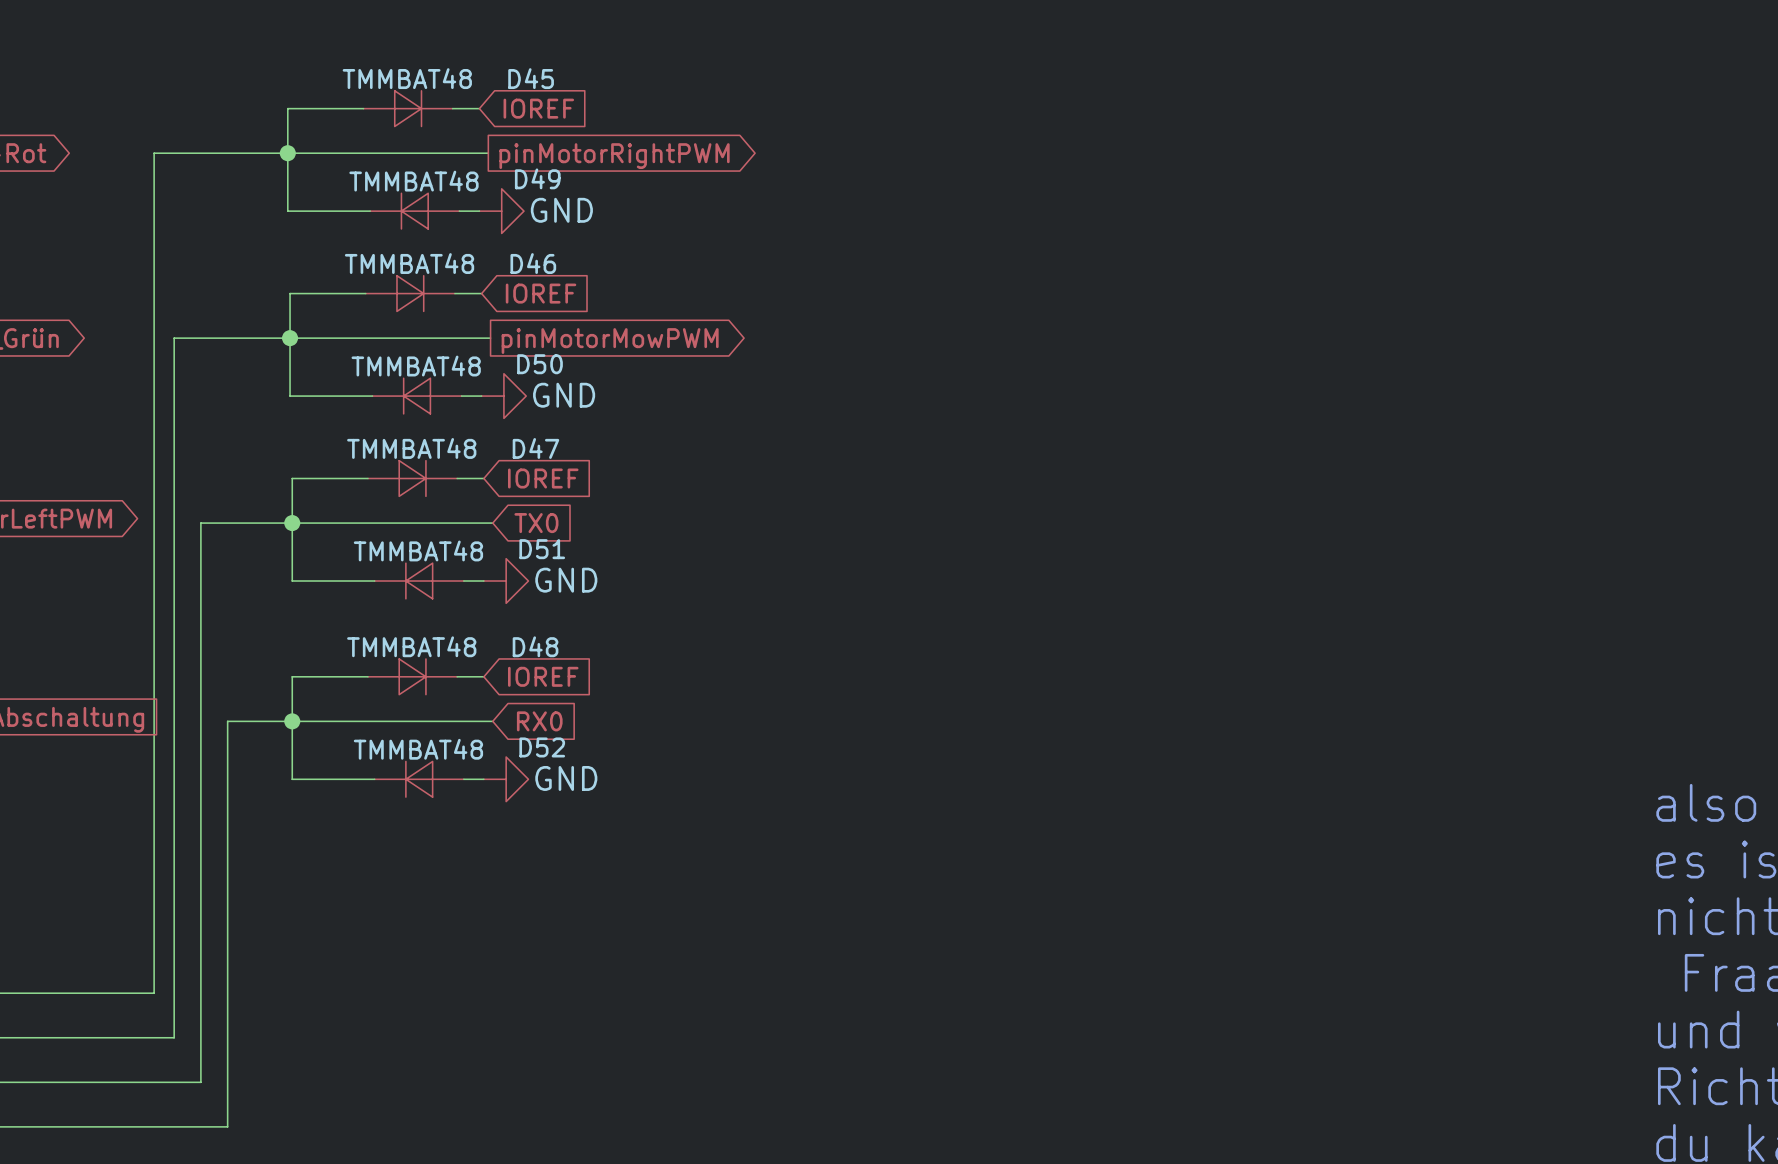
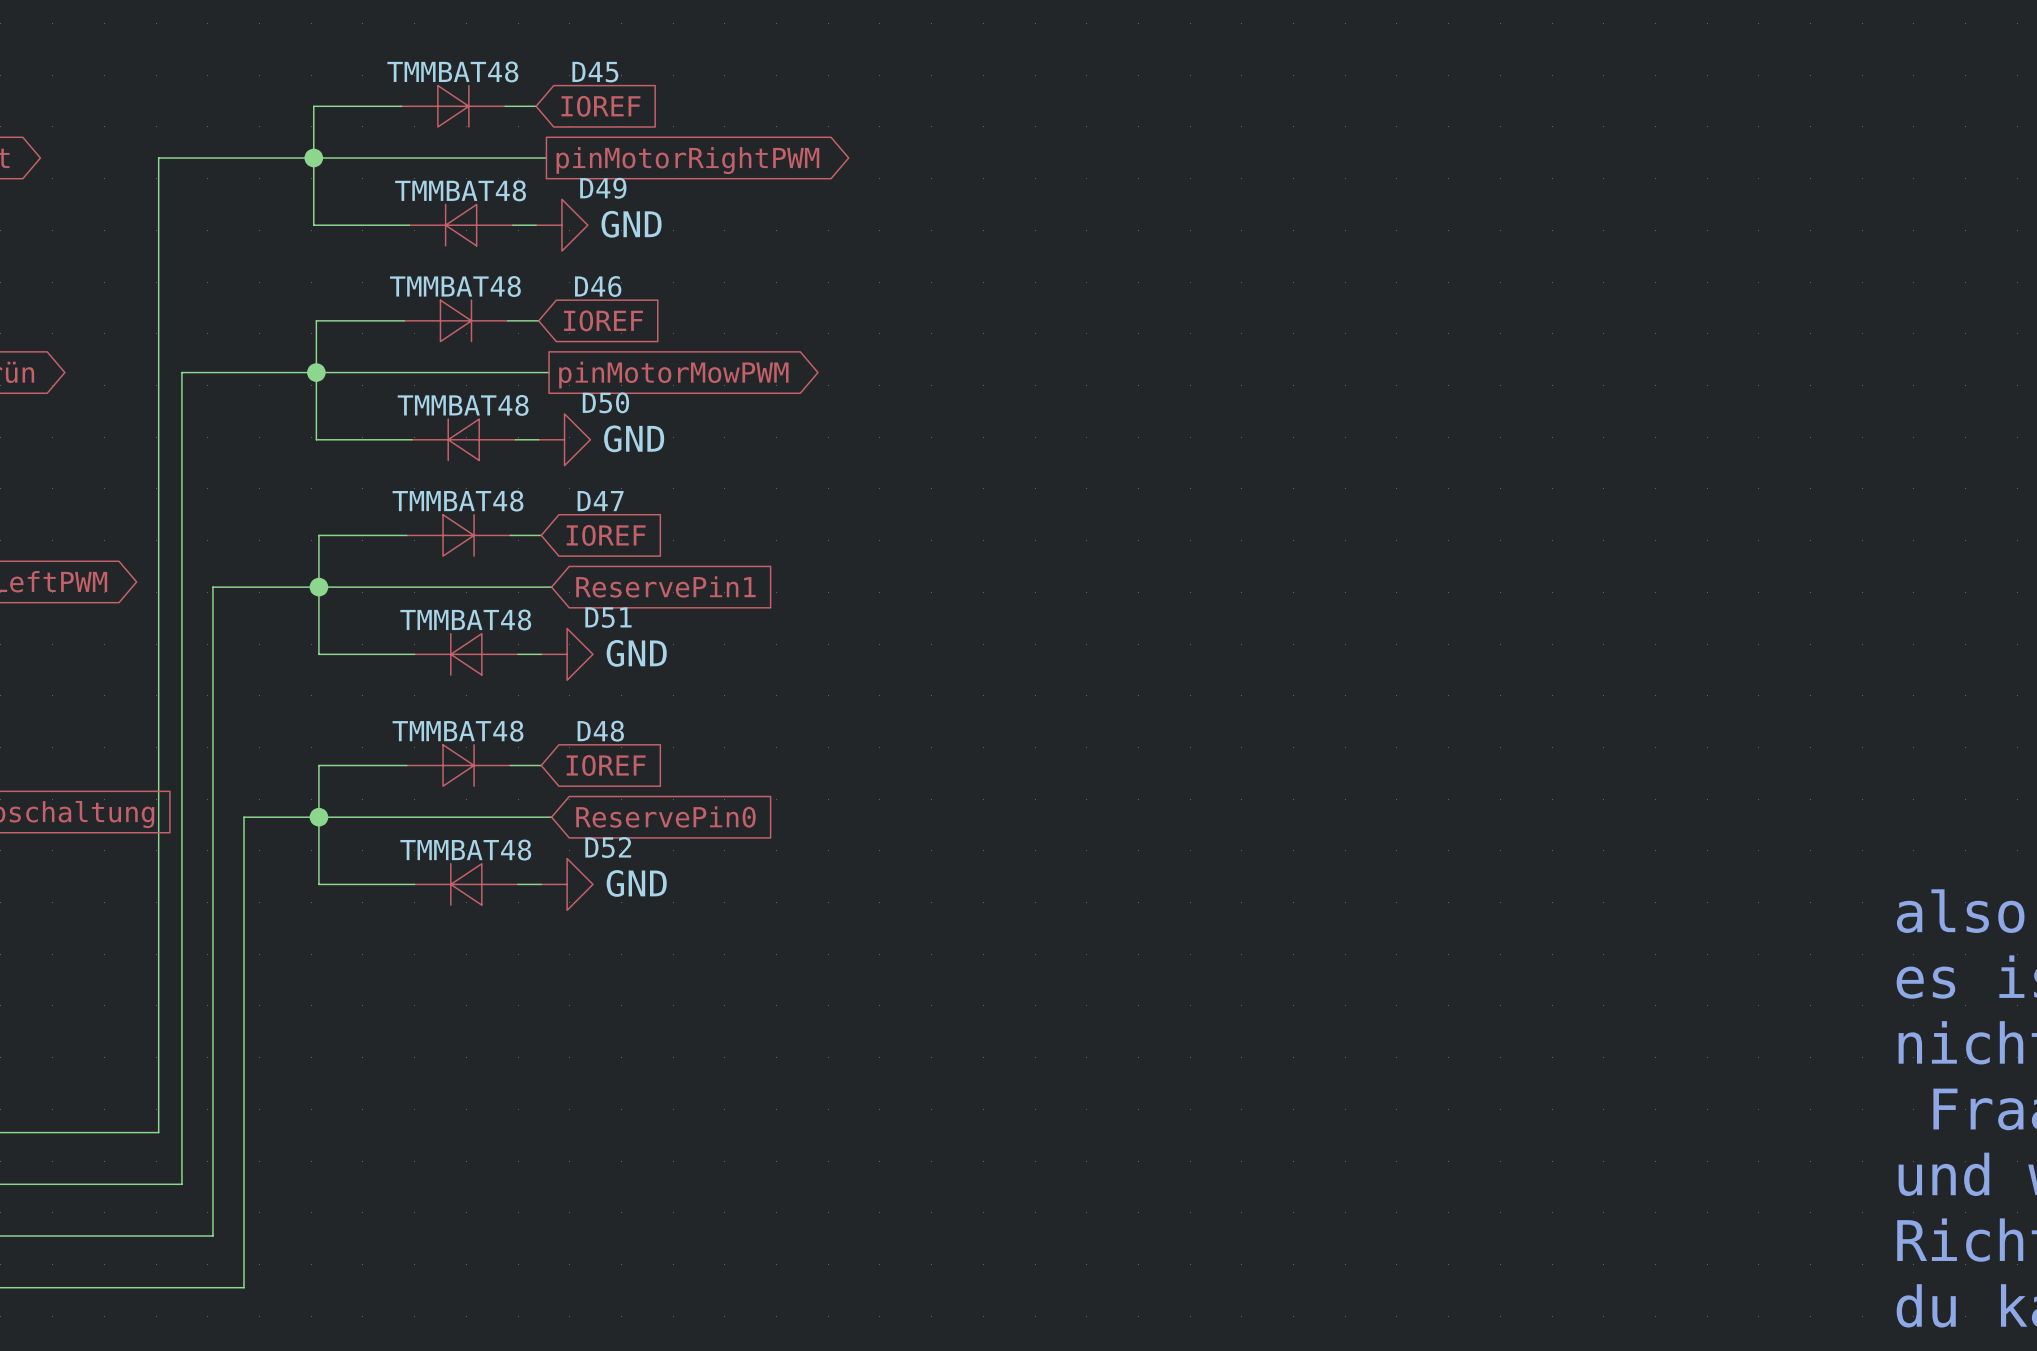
global label: TX0 (536, 523) -> ReservePin1 (665, 586)
global label: RX0 (539, 721) -> ReservePin0 (665, 816)

